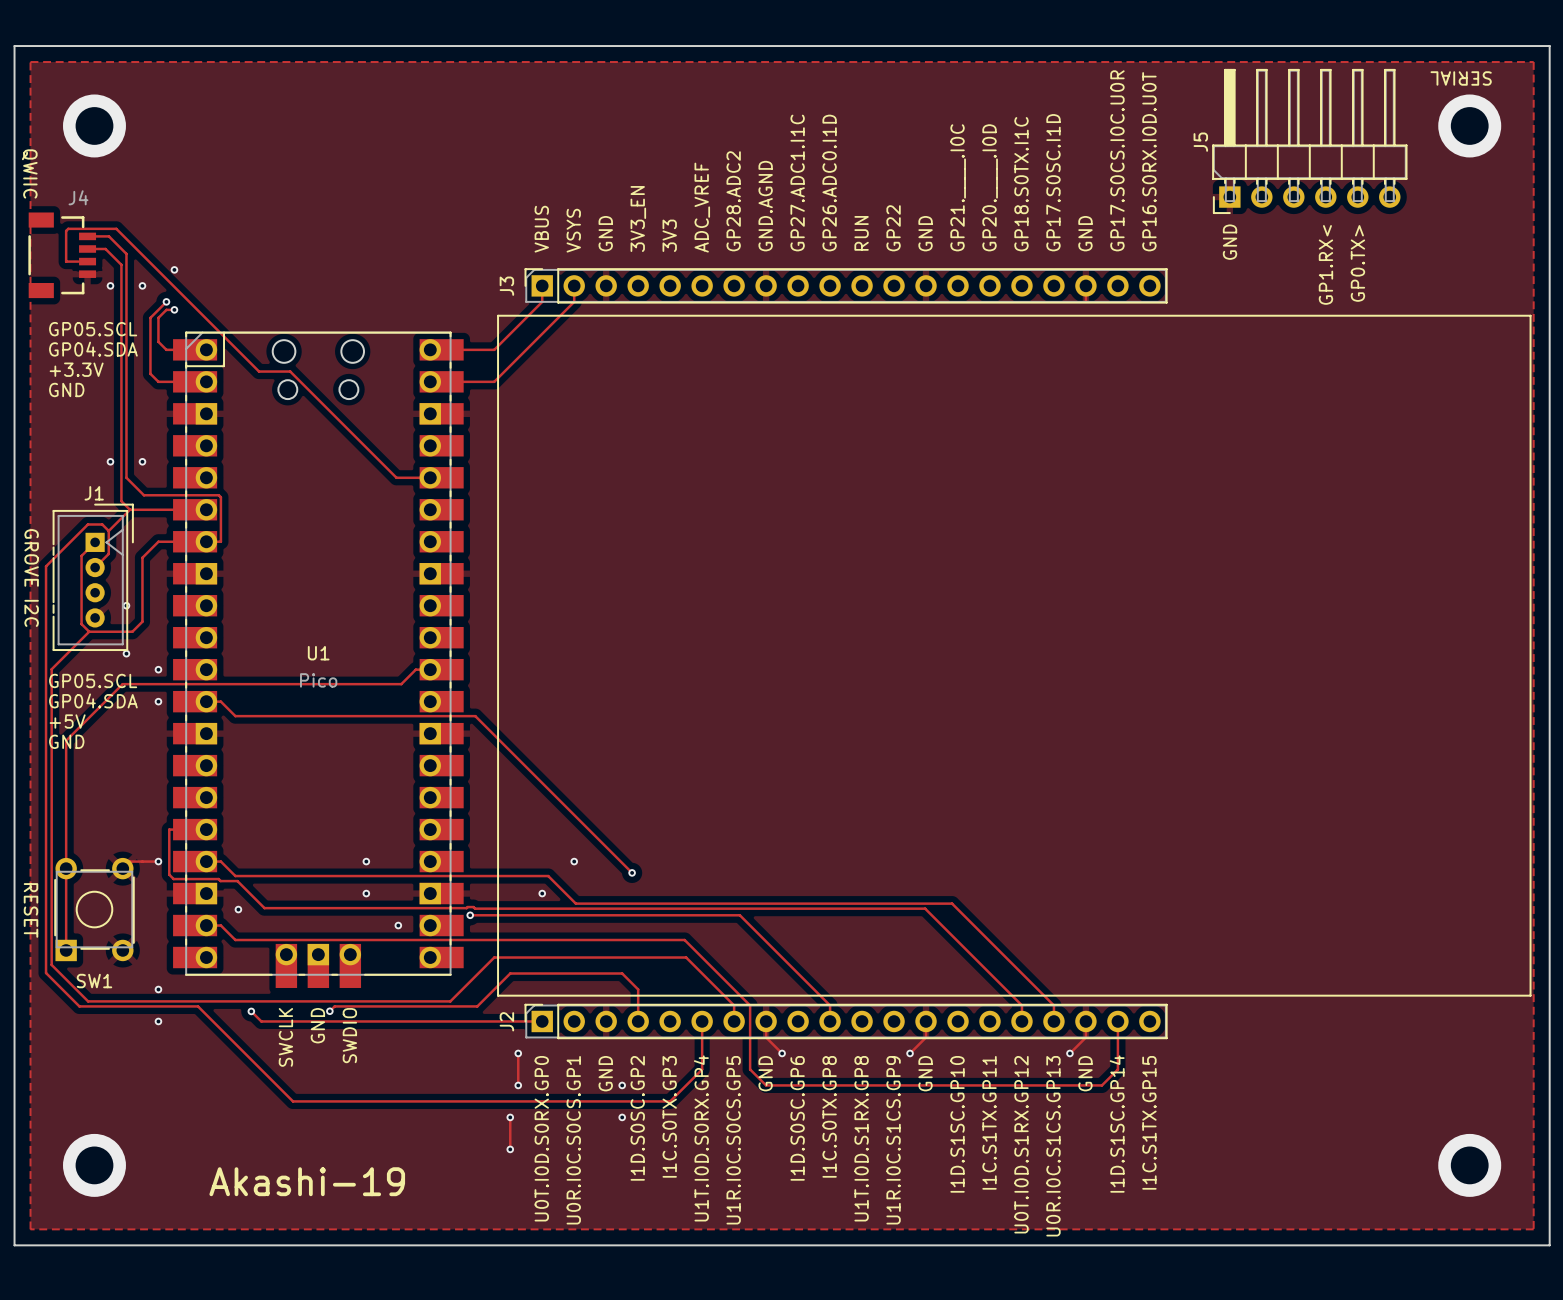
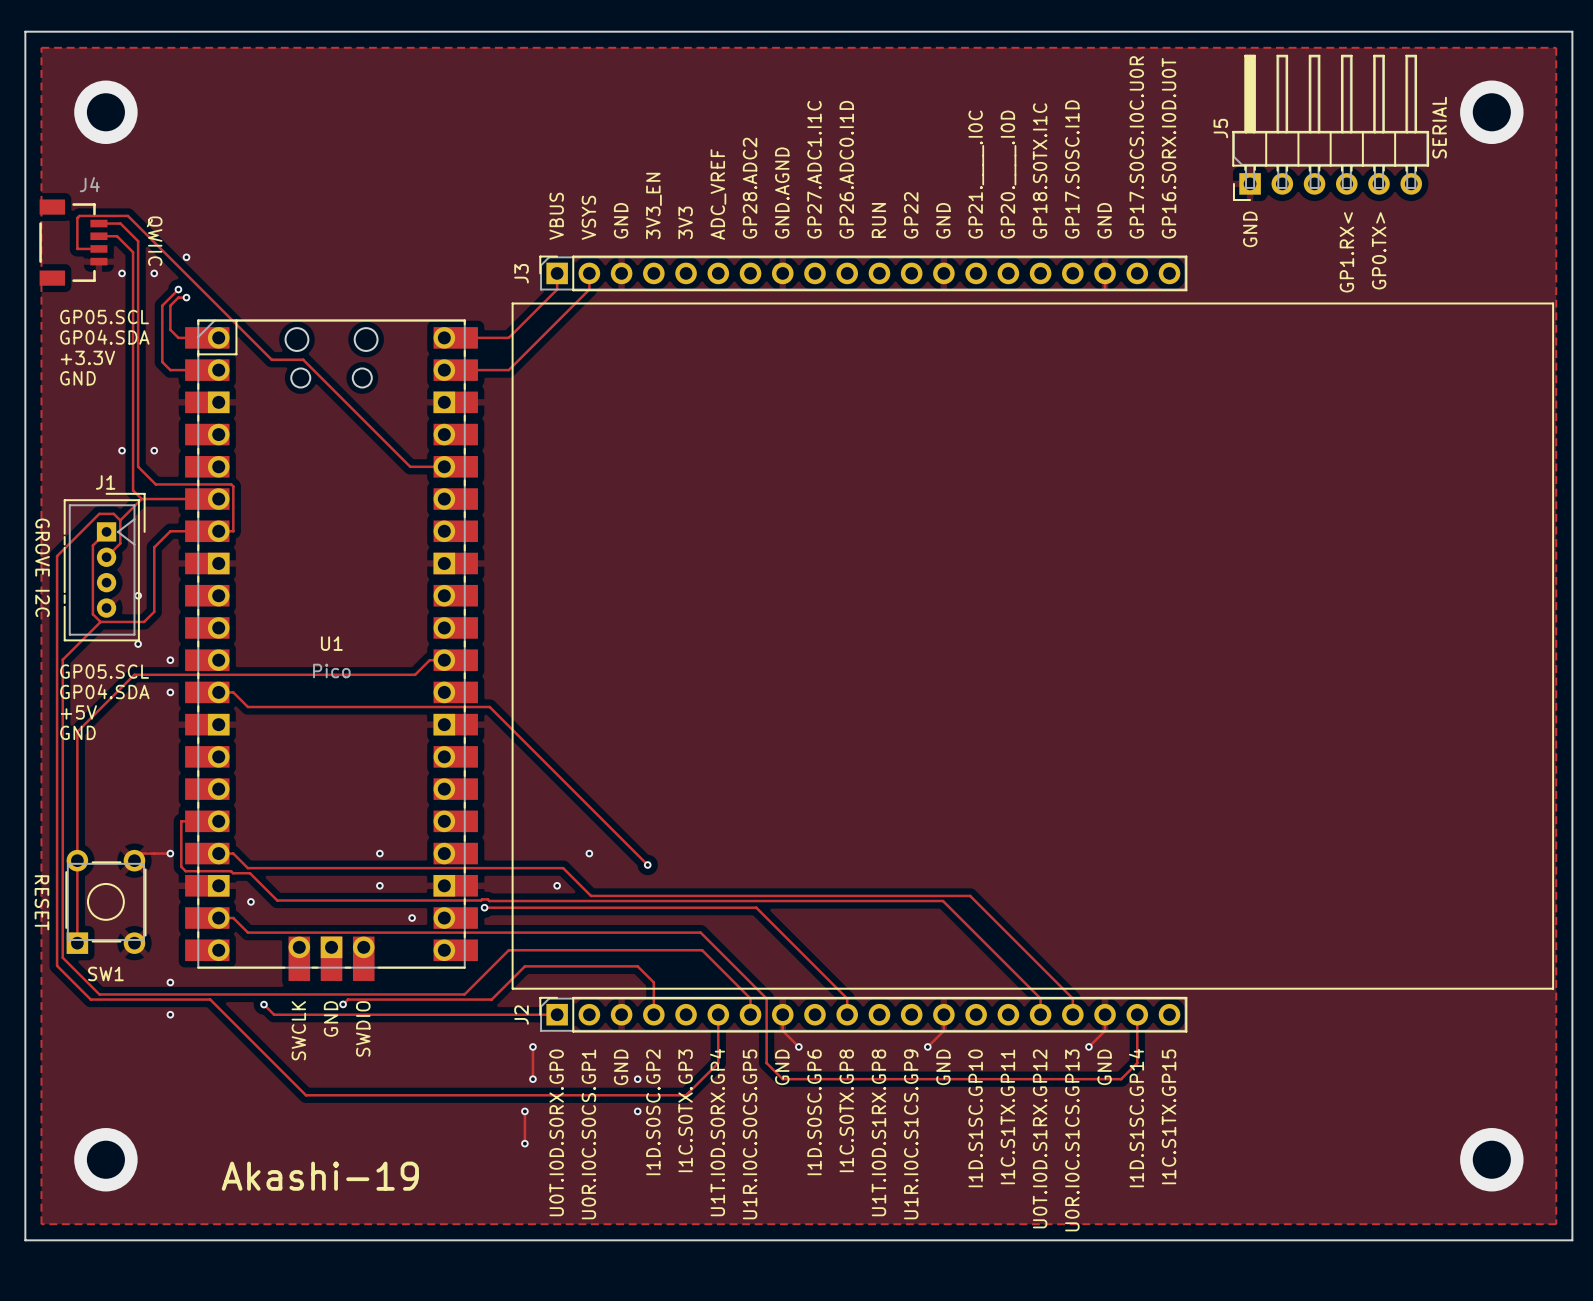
J5 value rotation: 0° (1461, 78) -> 90° clockwise (1439, 127)
J4 value position: QWIIC (29, 173) -> QWIIC (154, 241)

